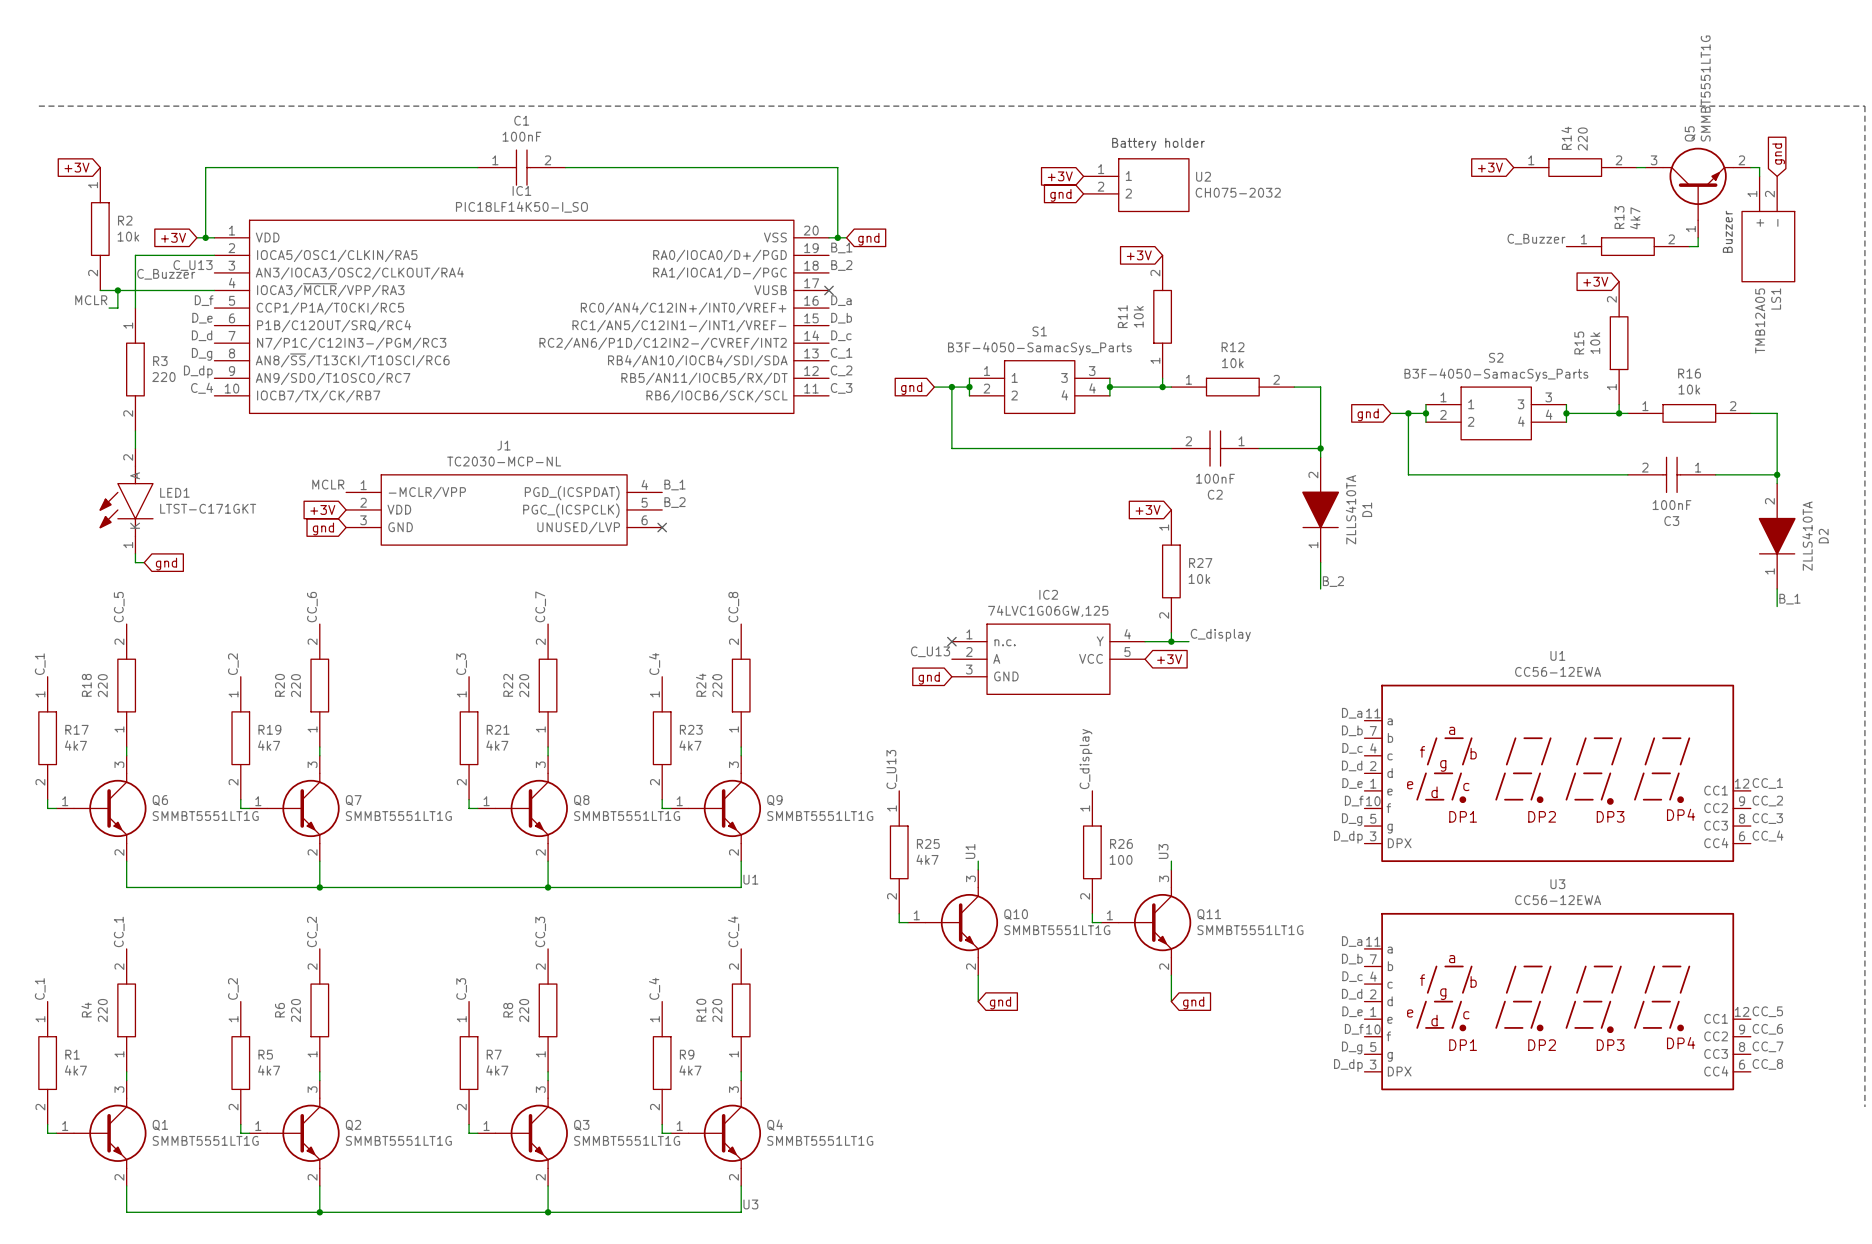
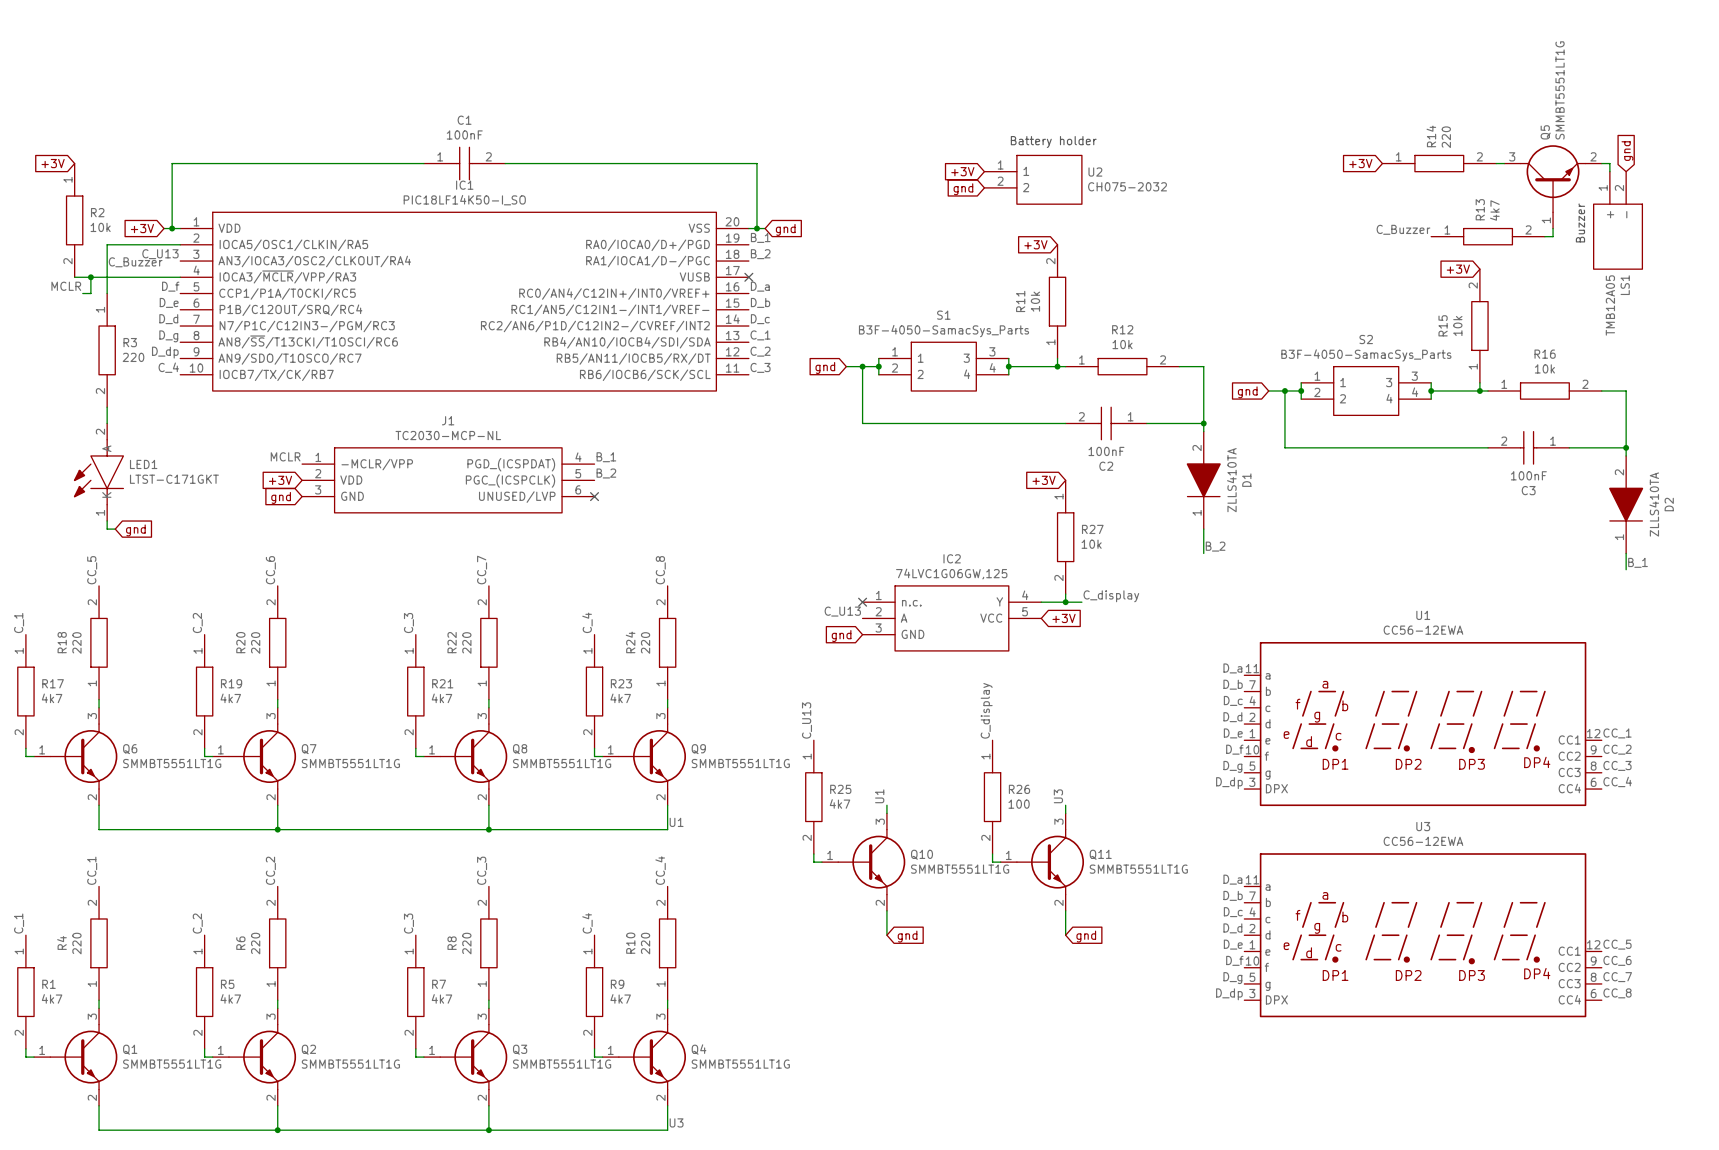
line: (38, 106) (1864, 106) (1864, 1106) -> none

